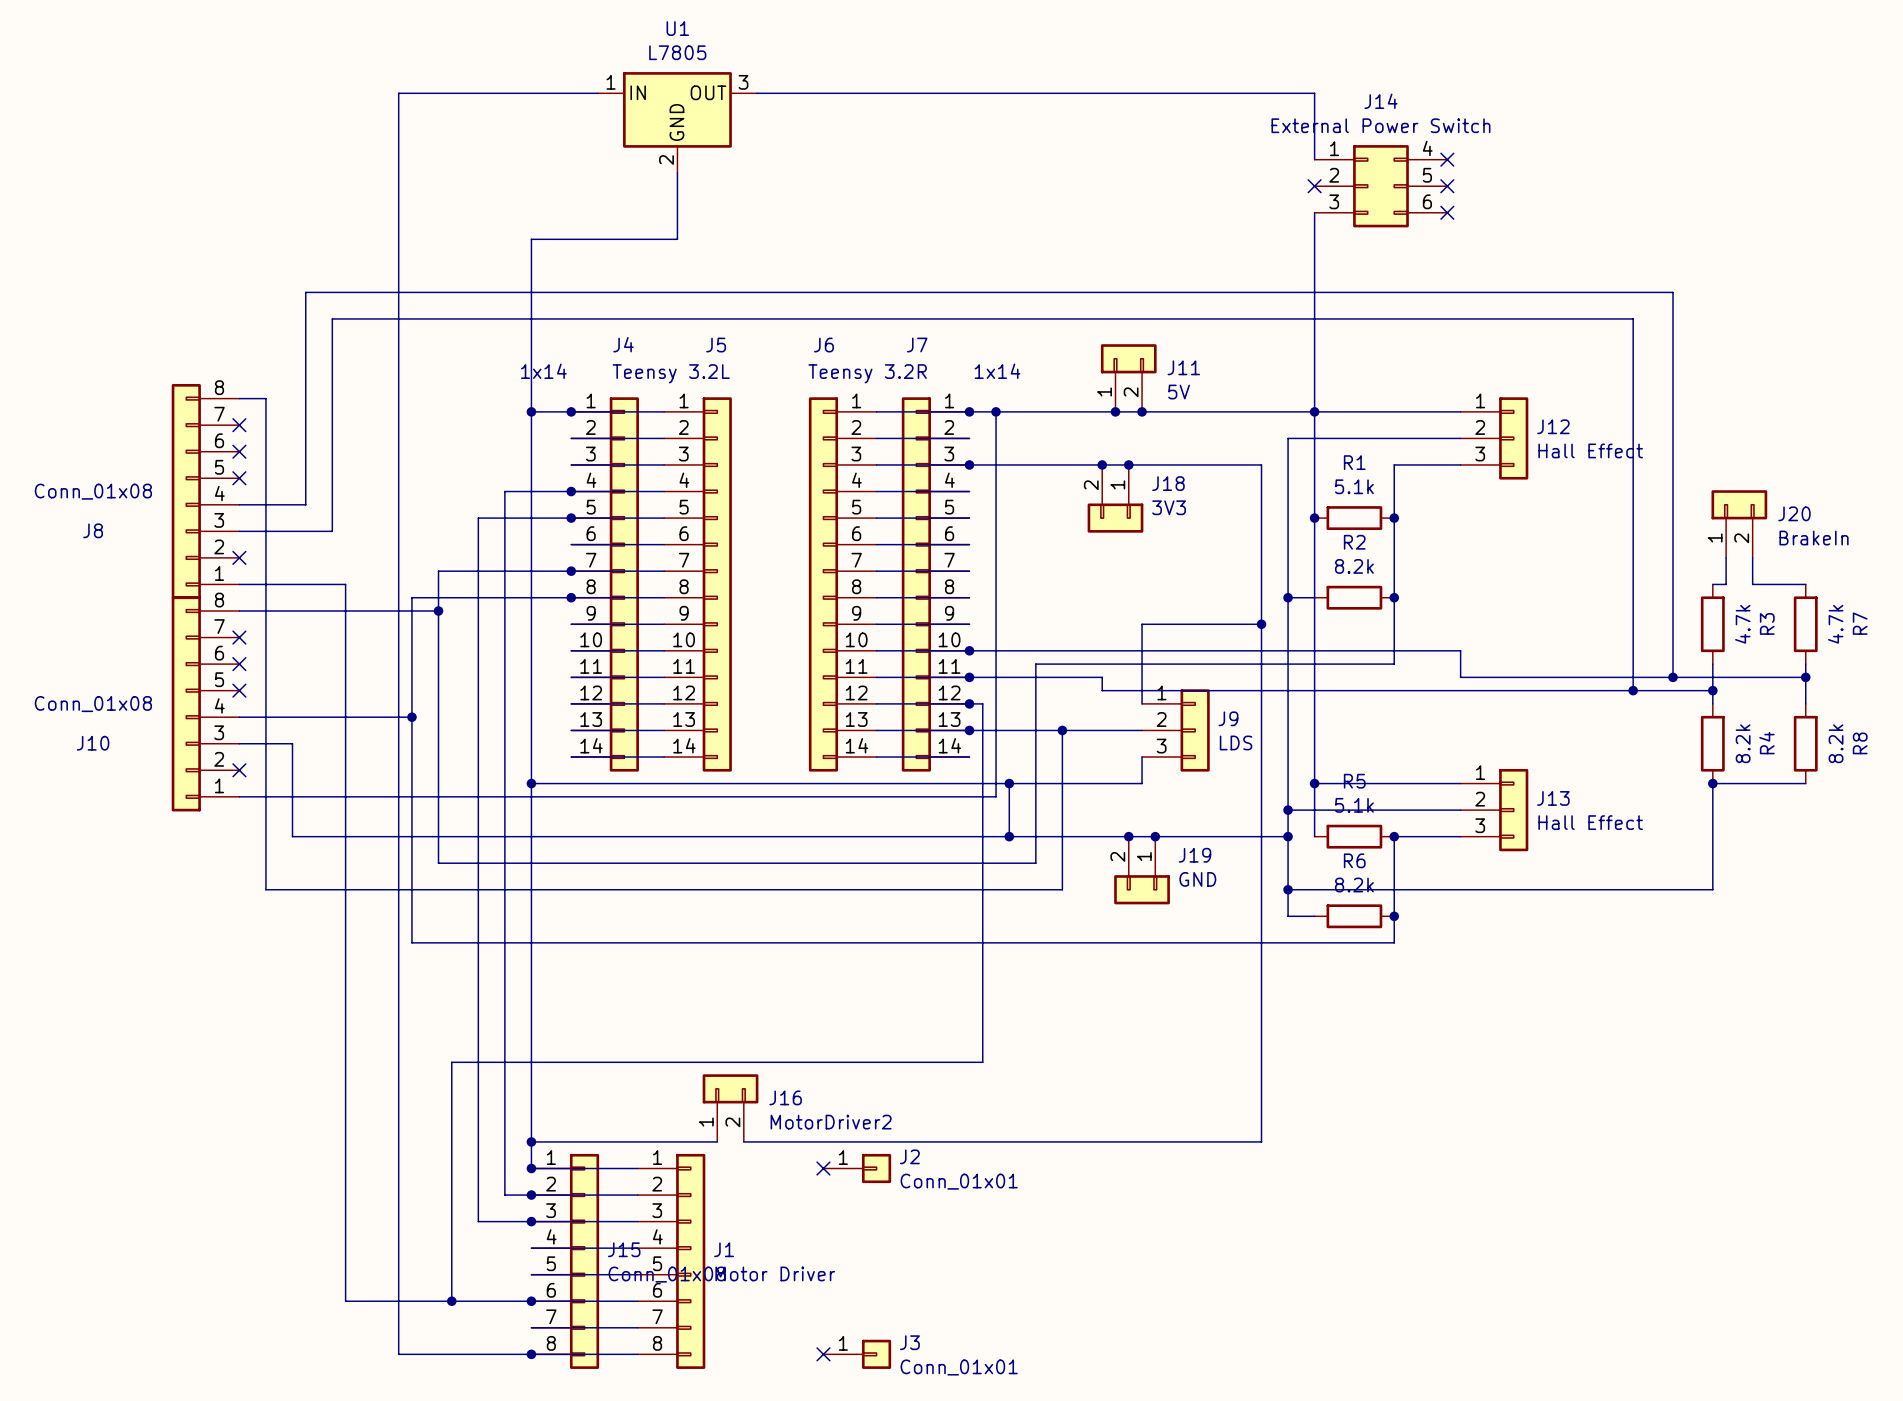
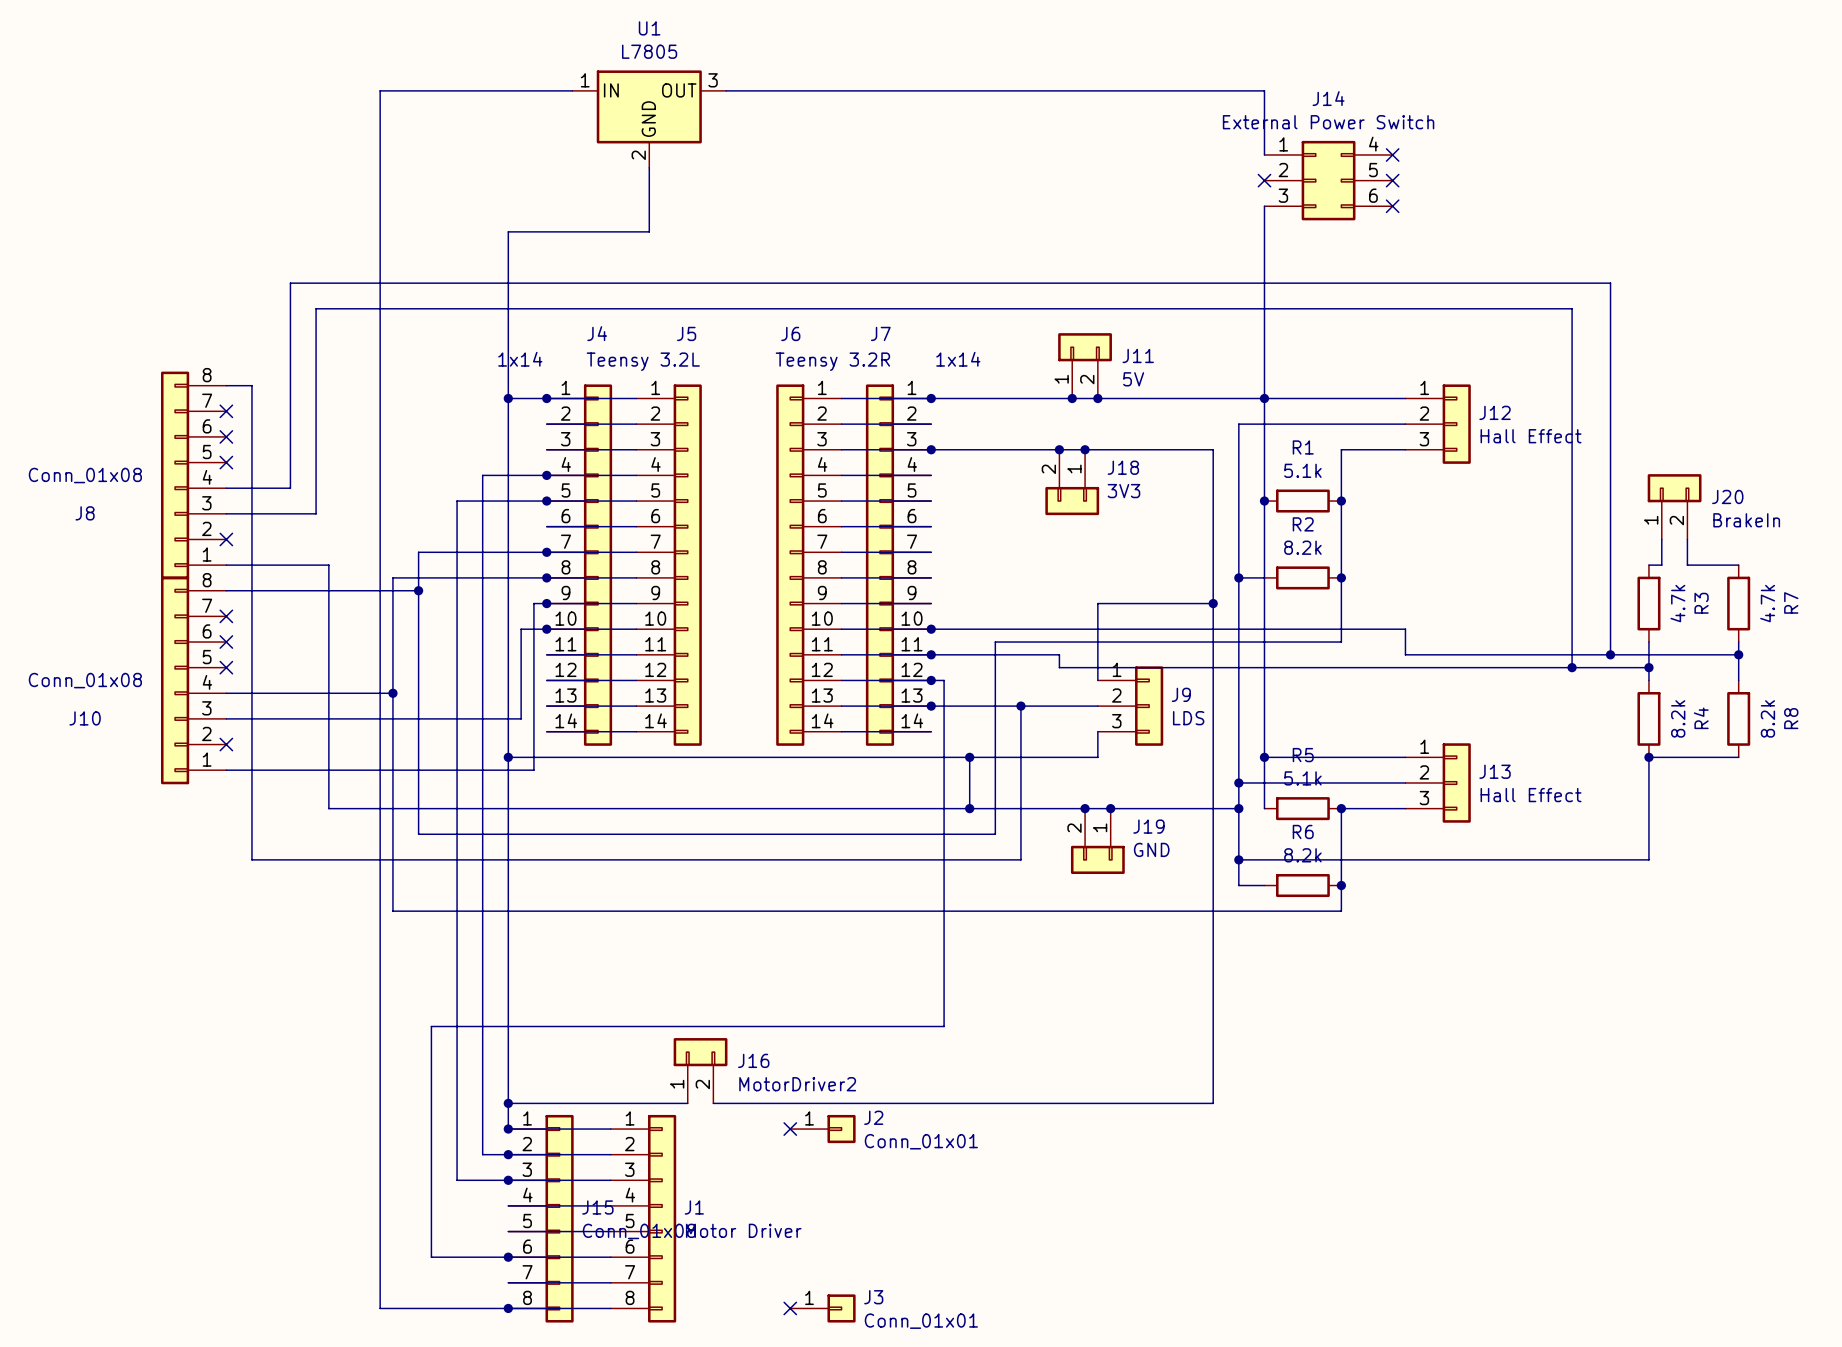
wire: (996, 411) (996, 796) (557, 796) -> (546, 603) (533, 603) (533, 770)
junction: (996, 411) -> none
junction: none -> (546, 603)
junction: none -> (546, 629)
wire: (292, 743) (292, 836) (345, 836) (345, 1301) (451, 1301) -> (277, 718) (521, 718) (521, 629) (546, 629)
junction: (451, 1301) -> none

